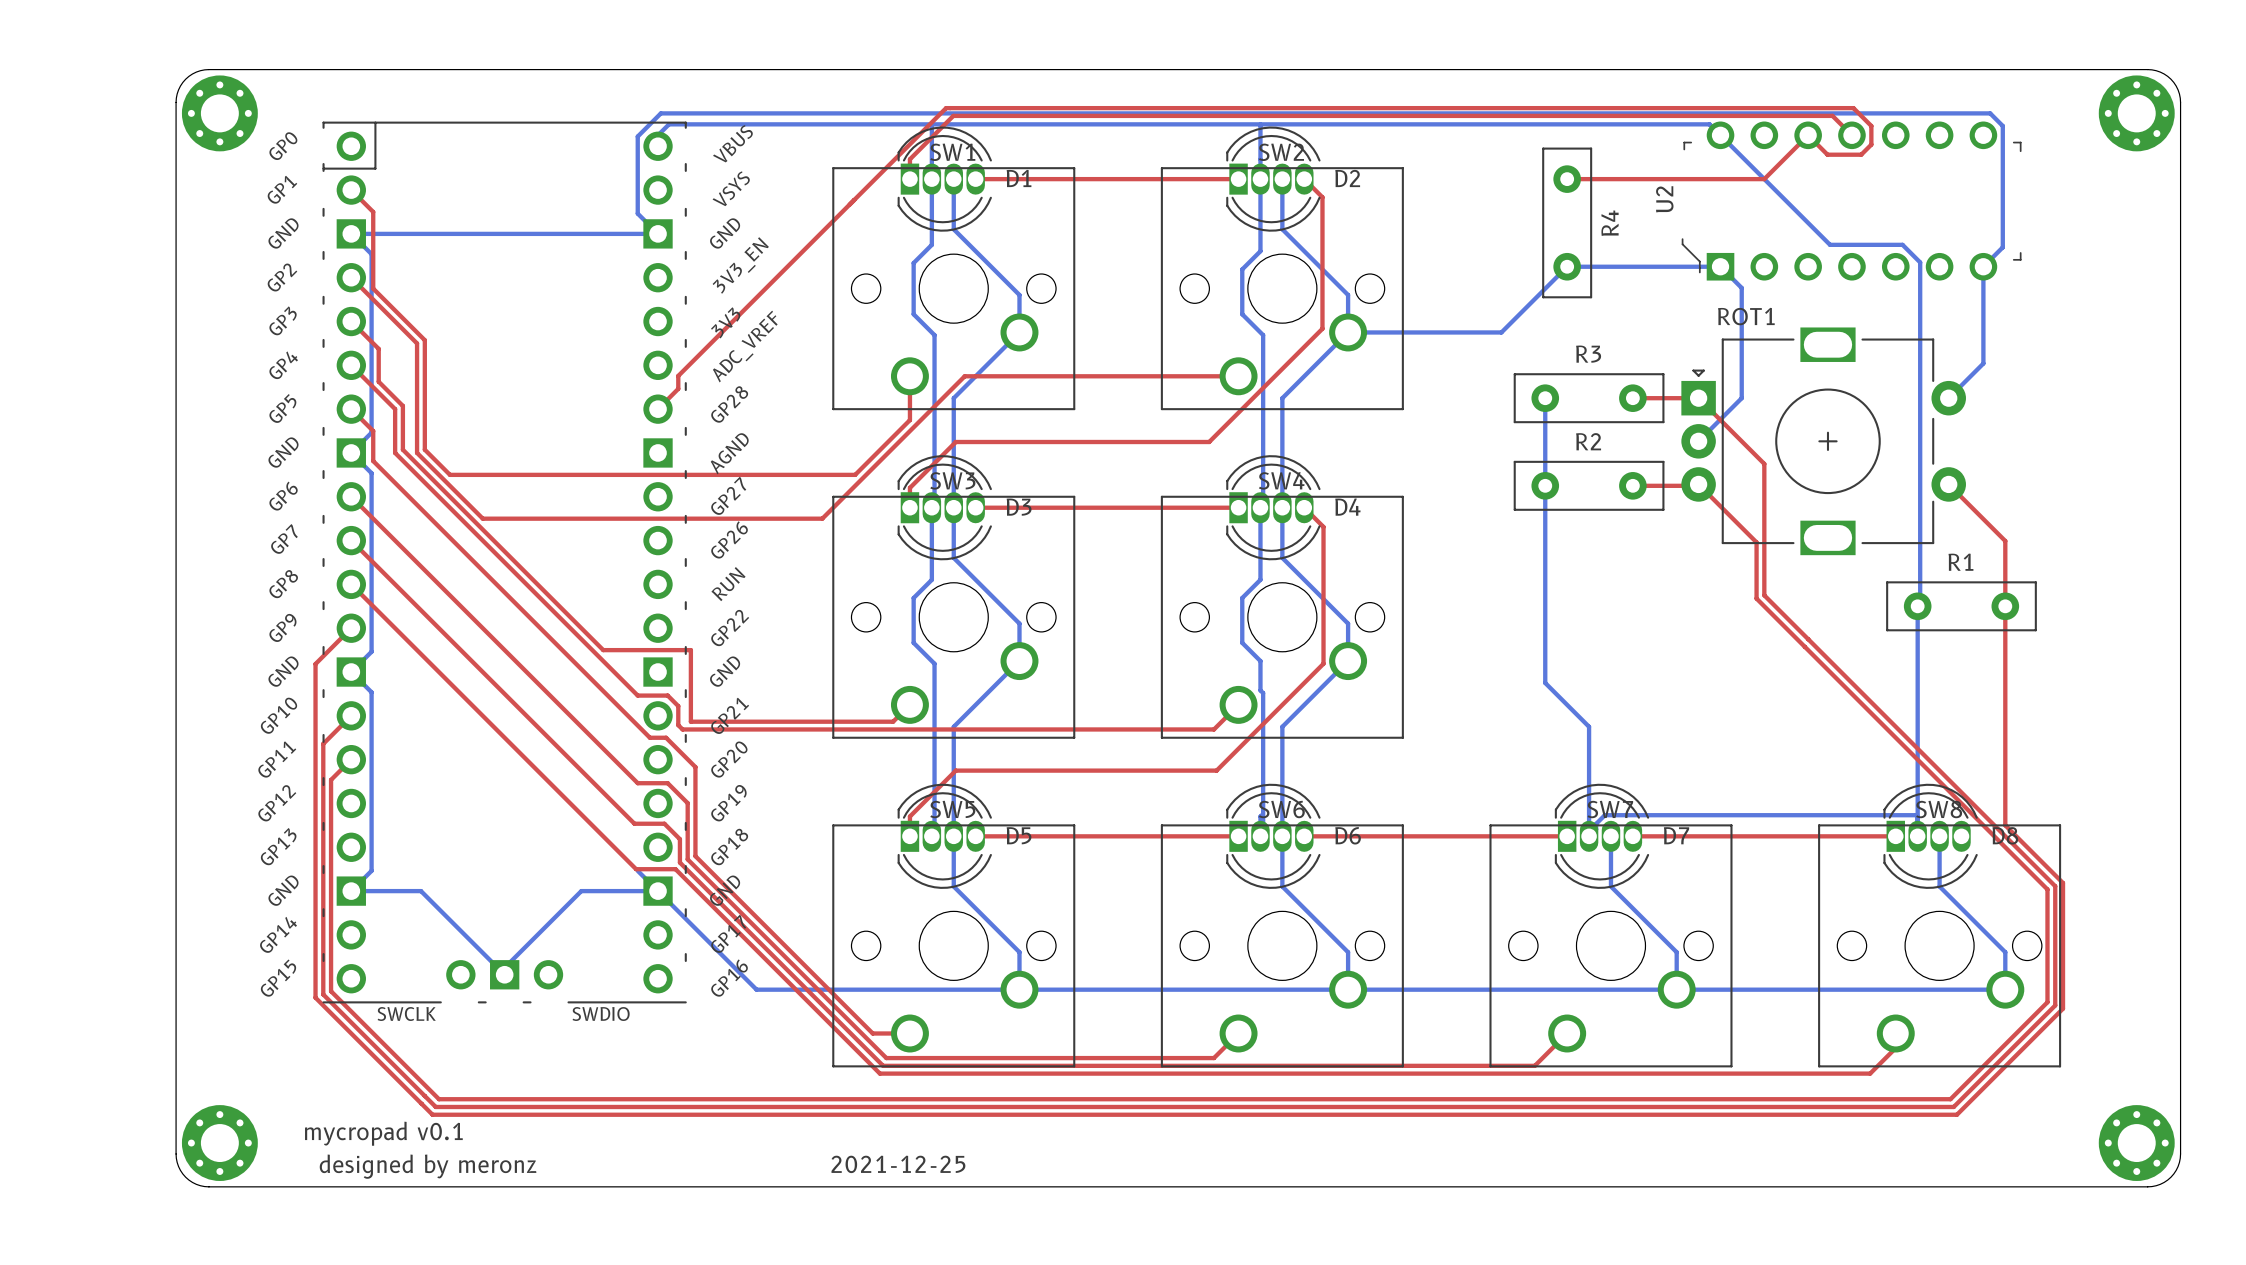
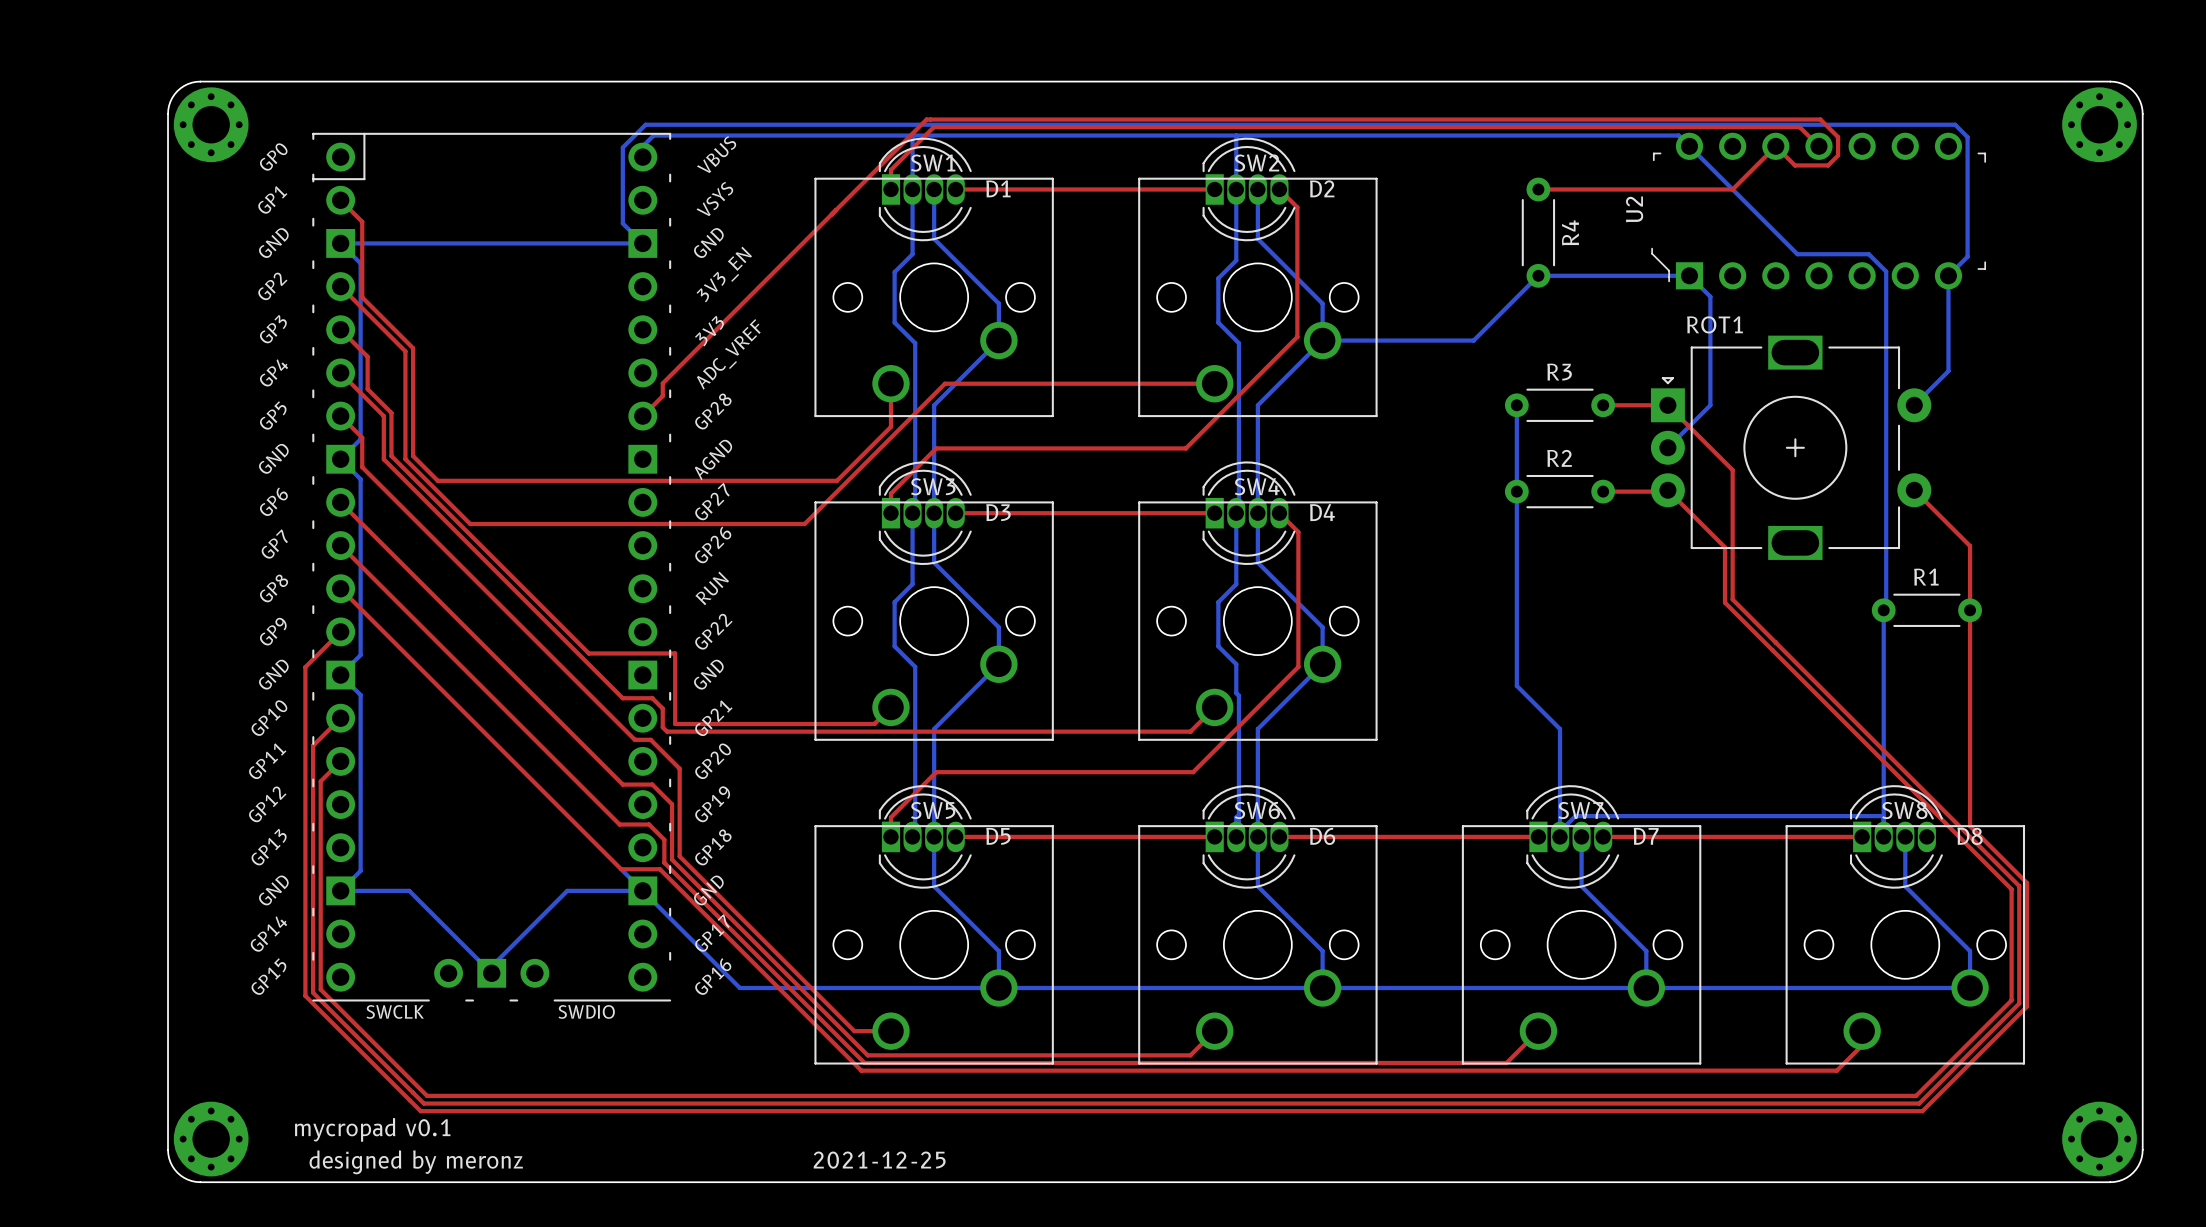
R4 footprint: [1542, 147, 1593, 299] -> [1521, 177, 1556, 288]
R3 footprint: [1513, 373, 1665, 424] -> [1504, 388, 1616, 422]
R2 footprint: [1513, 460, 1665, 511] -> [1504, 474, 1616, 509]
R1 footprint: [1886, 581, 2037, 632] -> [1871, 593, 1982, 627]

